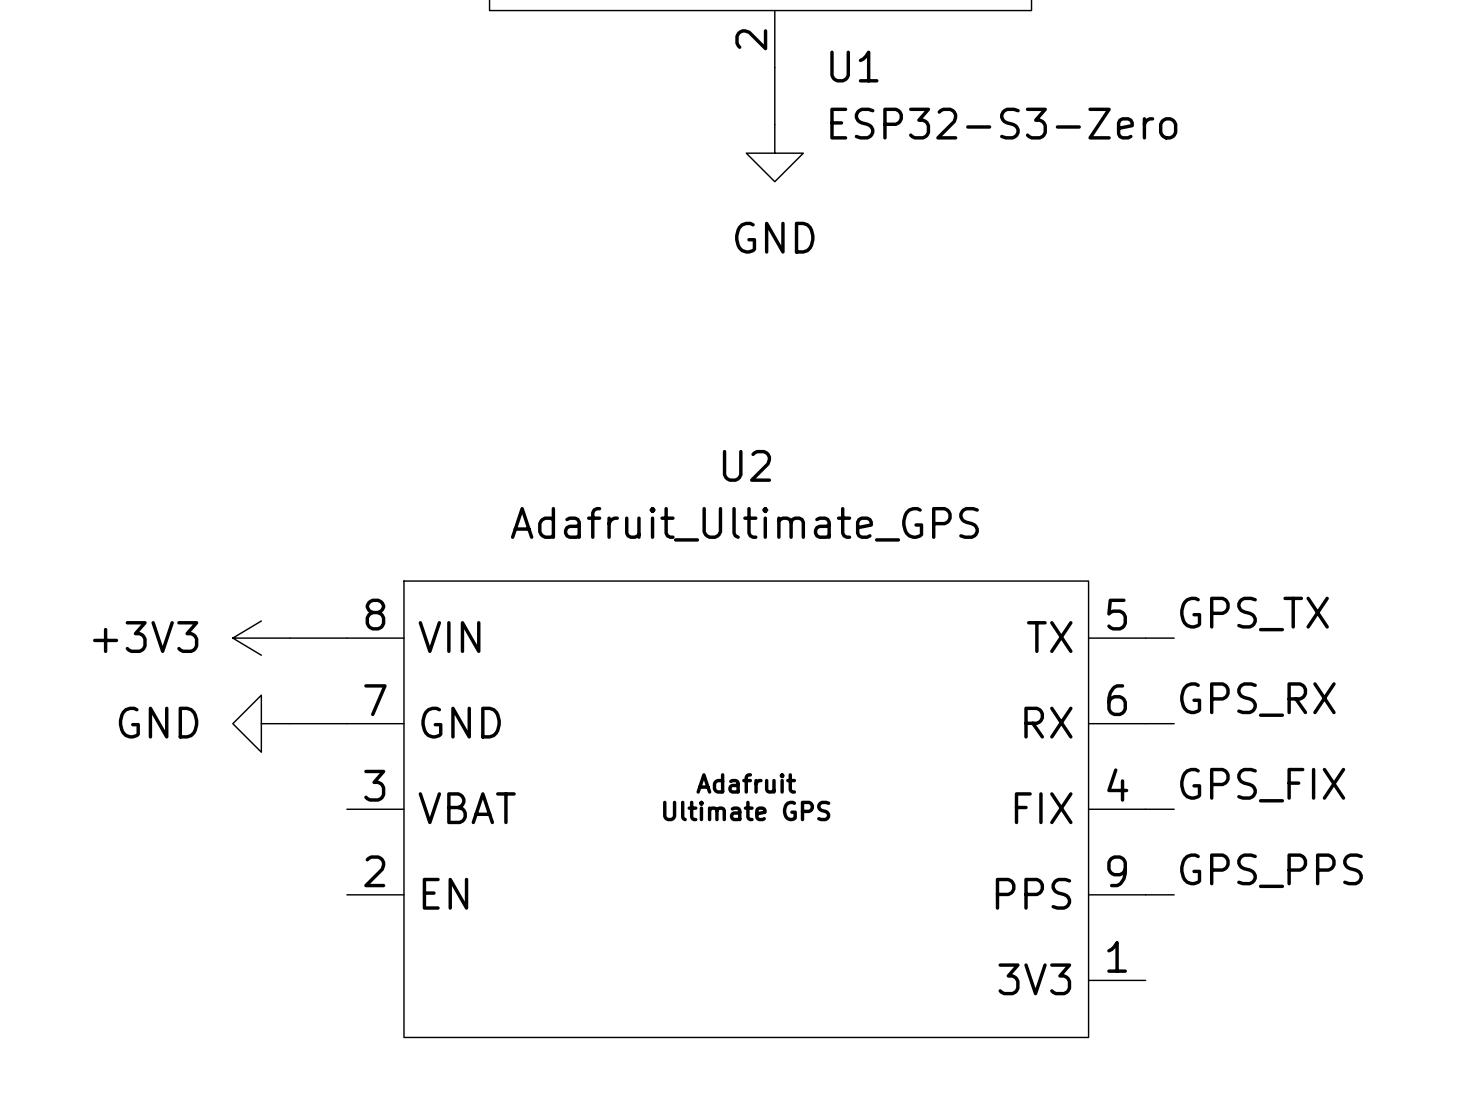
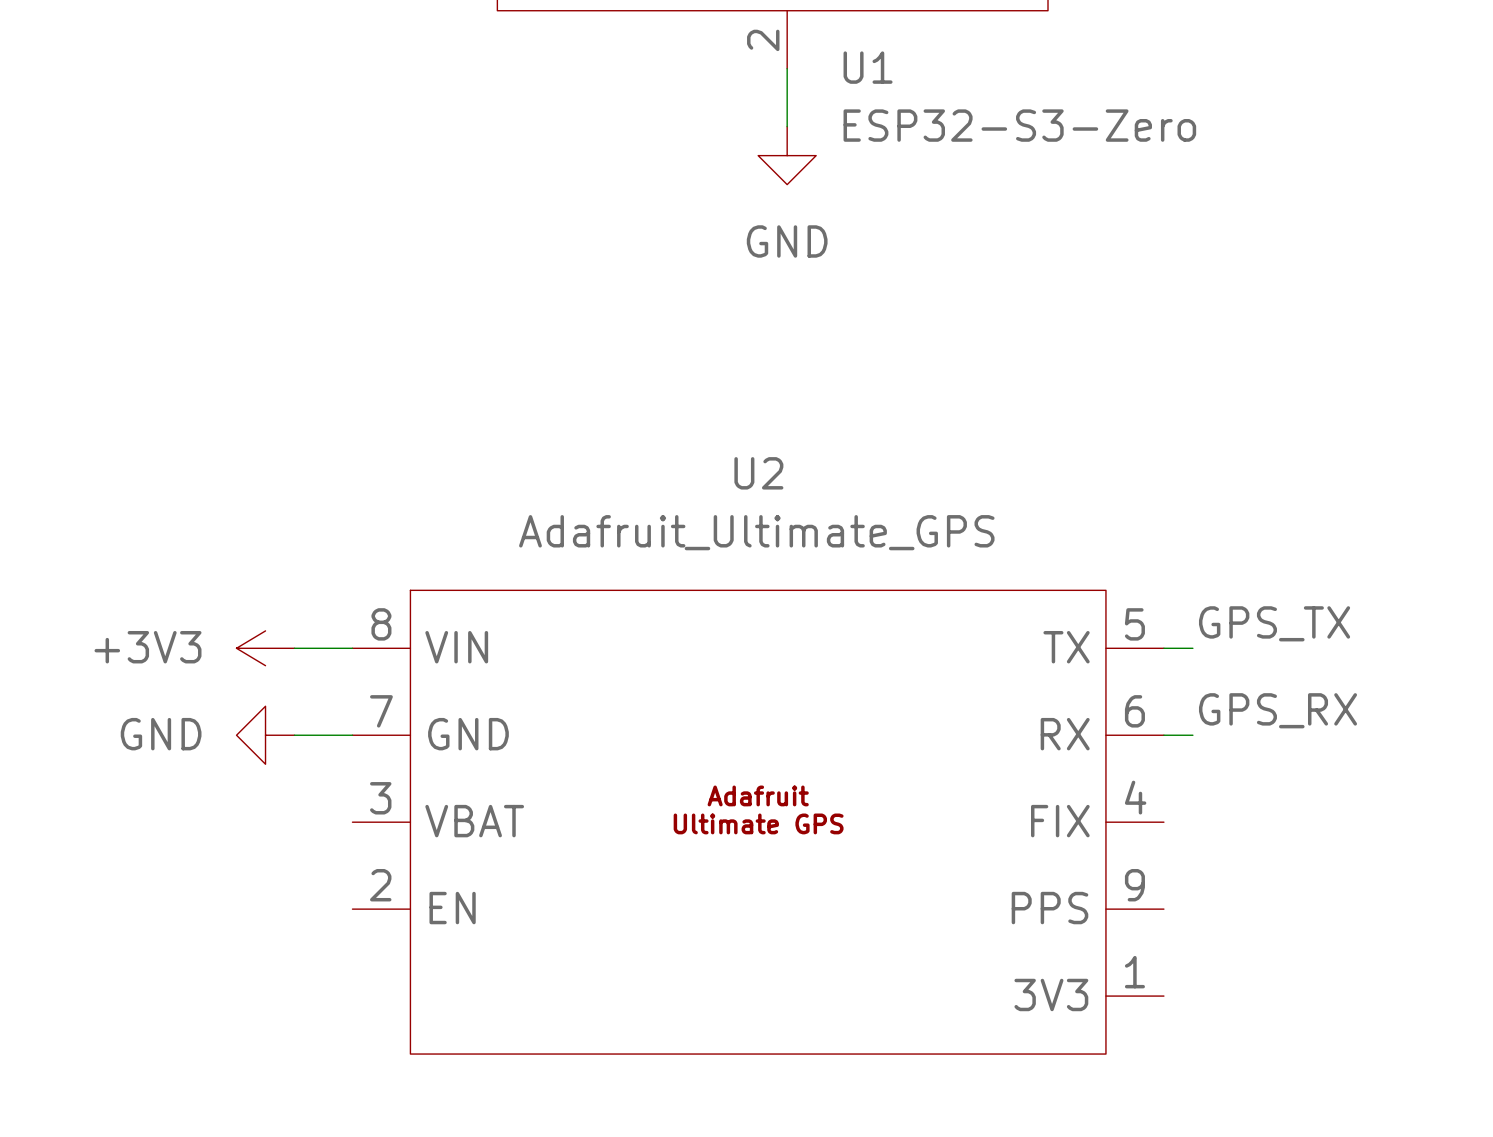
label: GPS_FIX (1262, 785) -> none
wire: (1145, 809) (1174, 809) -> none
label: GPS_PPS (1271, 870) -> none
wire: (1145, 894) (1174, 894) -> none

